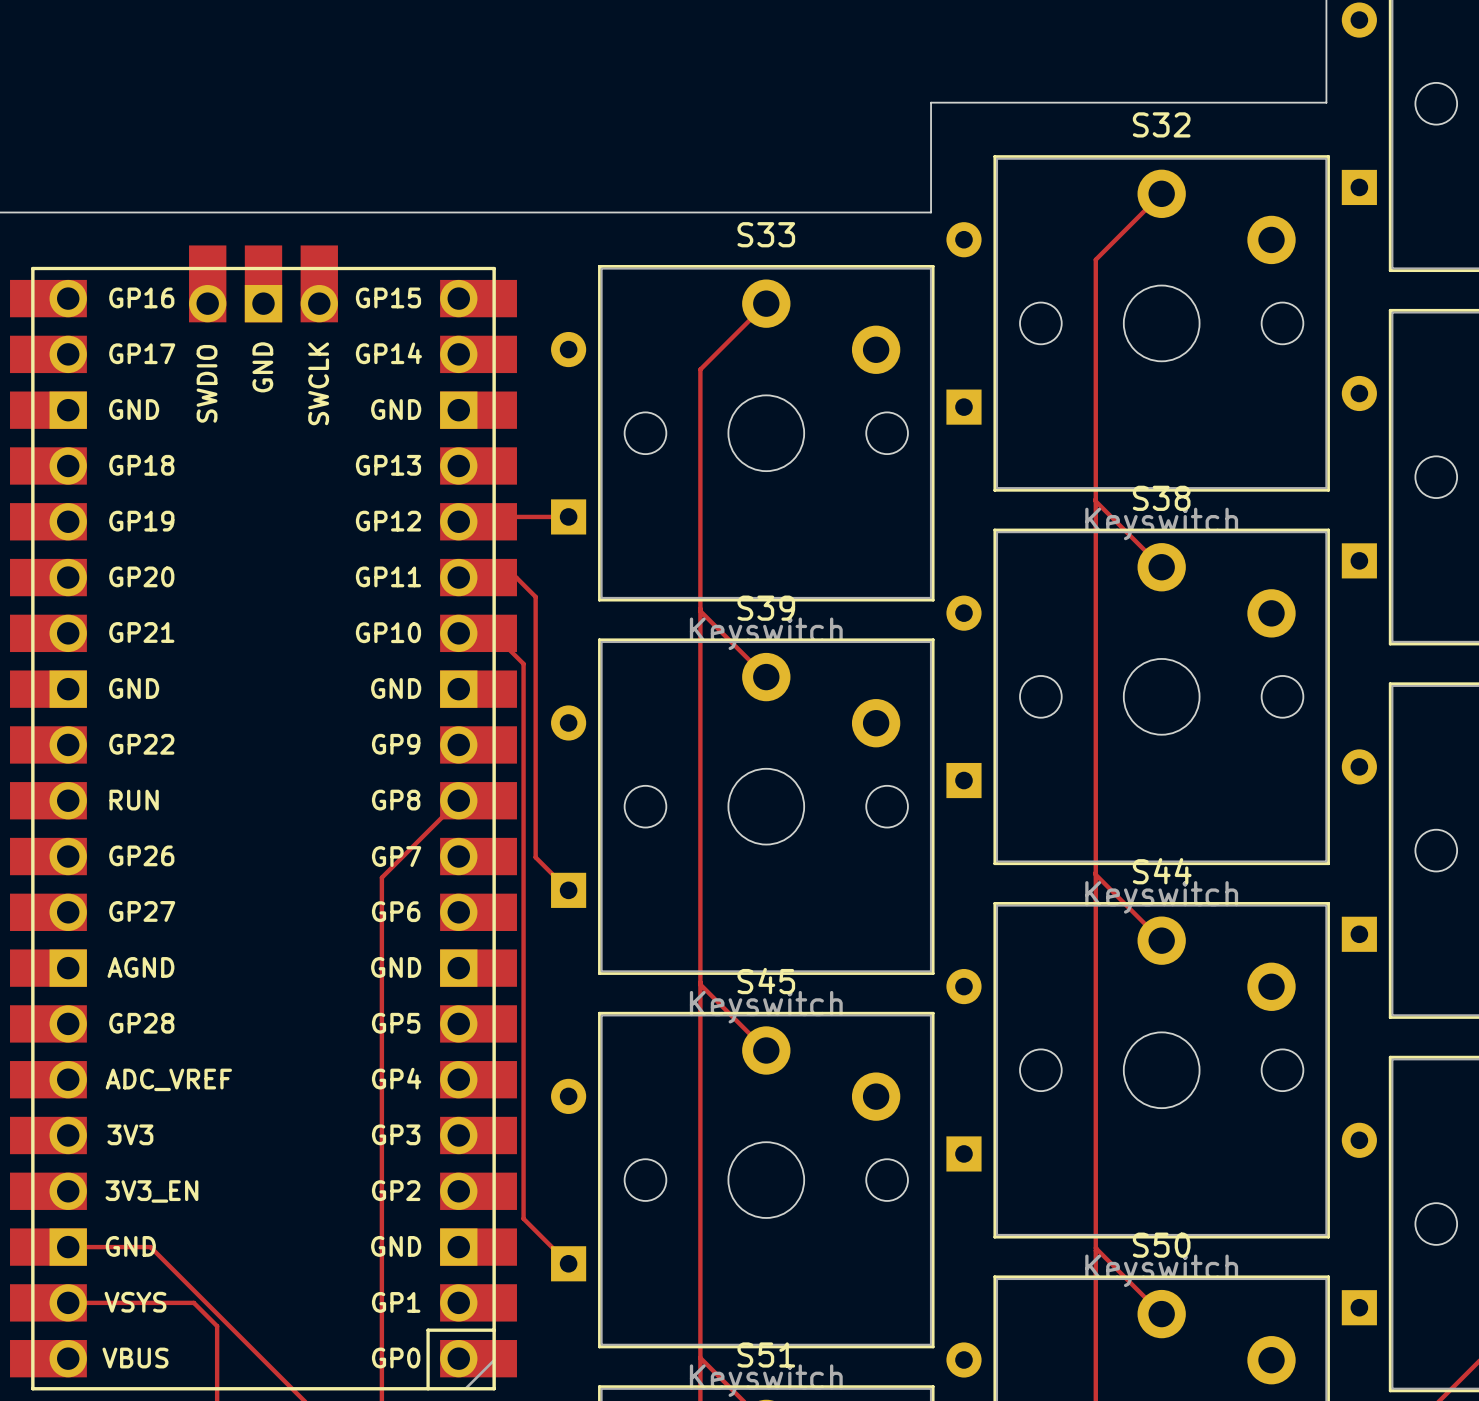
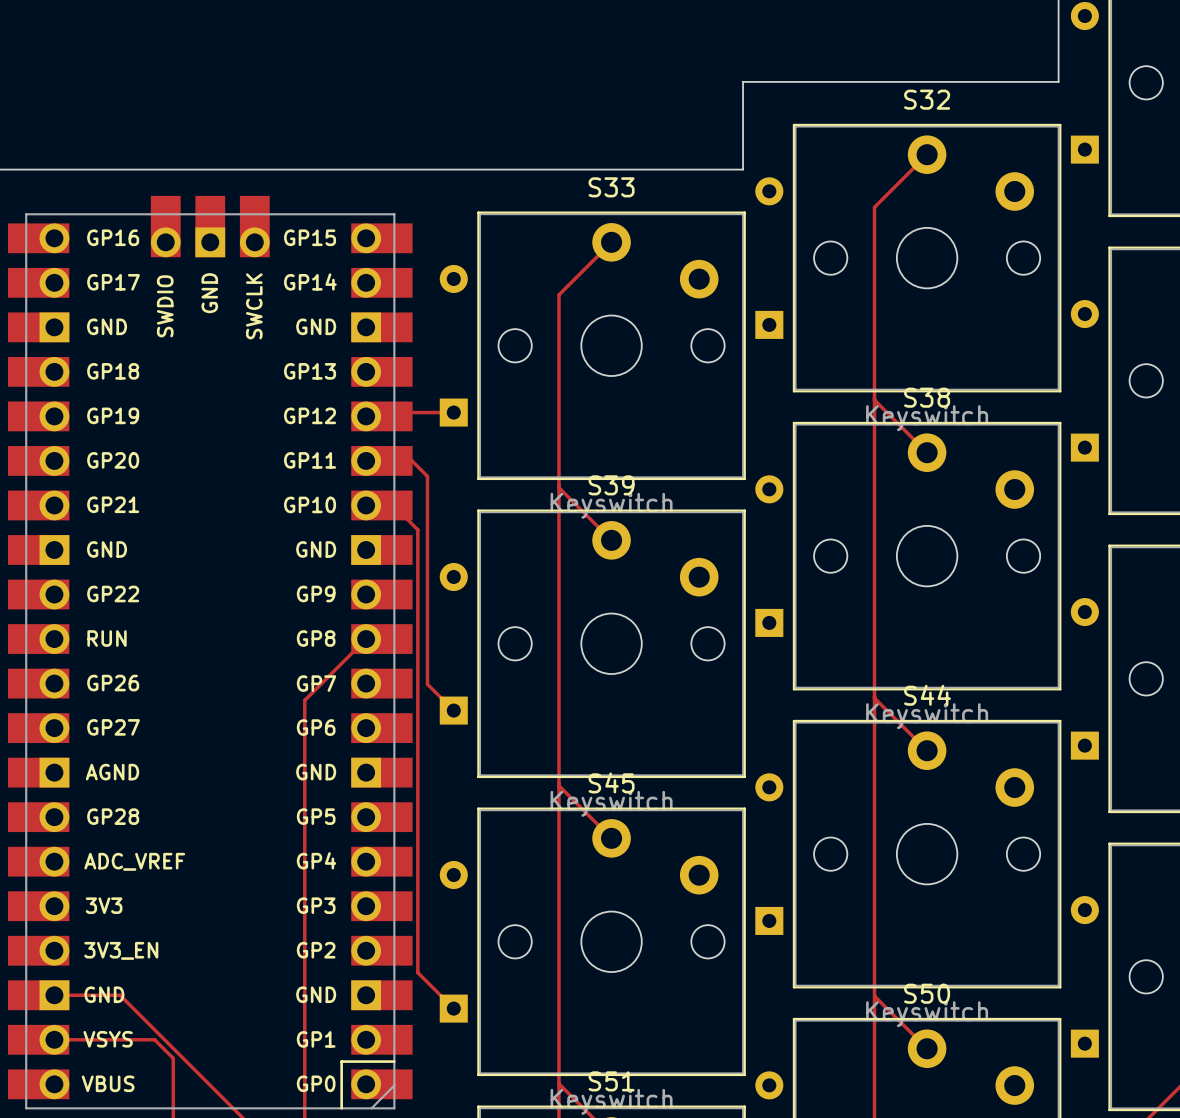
part footprint: [10, 245, 517, 1391] -> [7, 195, 413, 1110]

